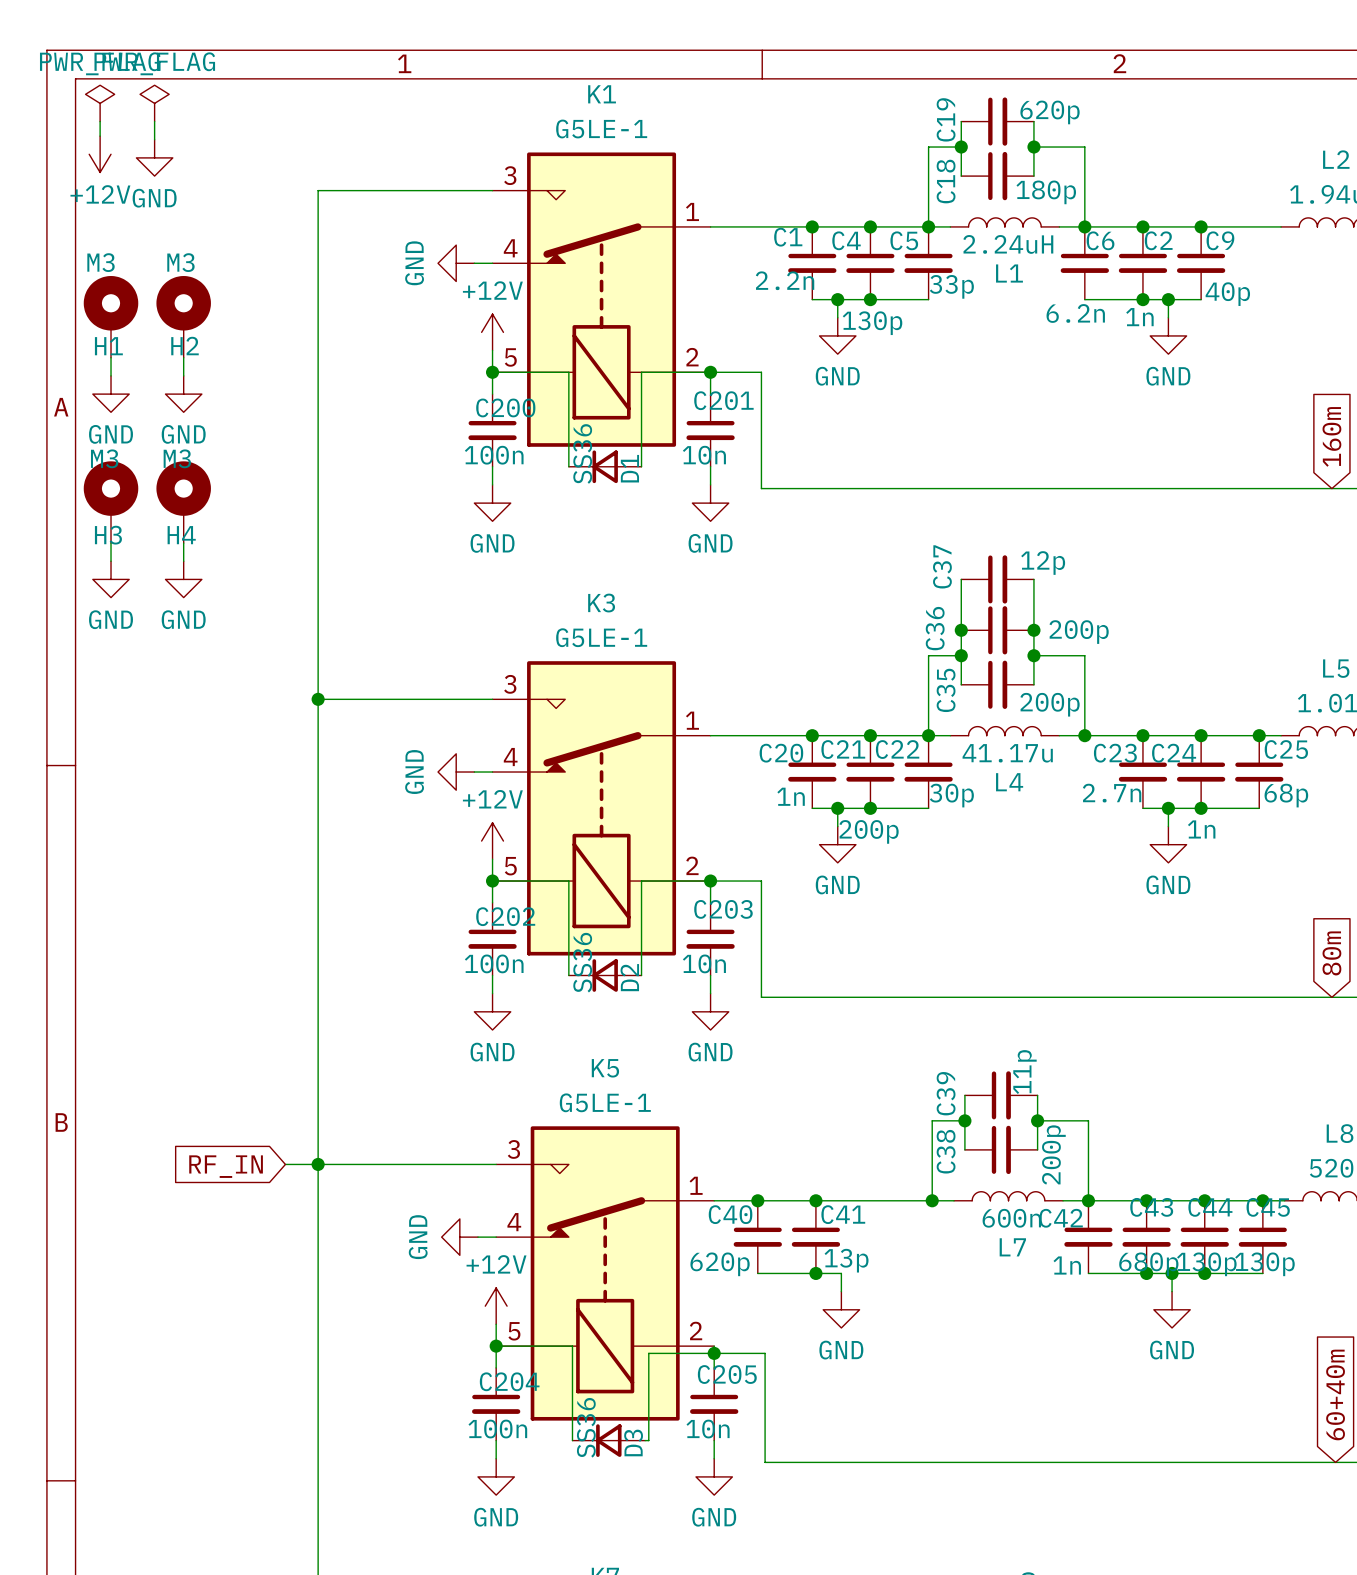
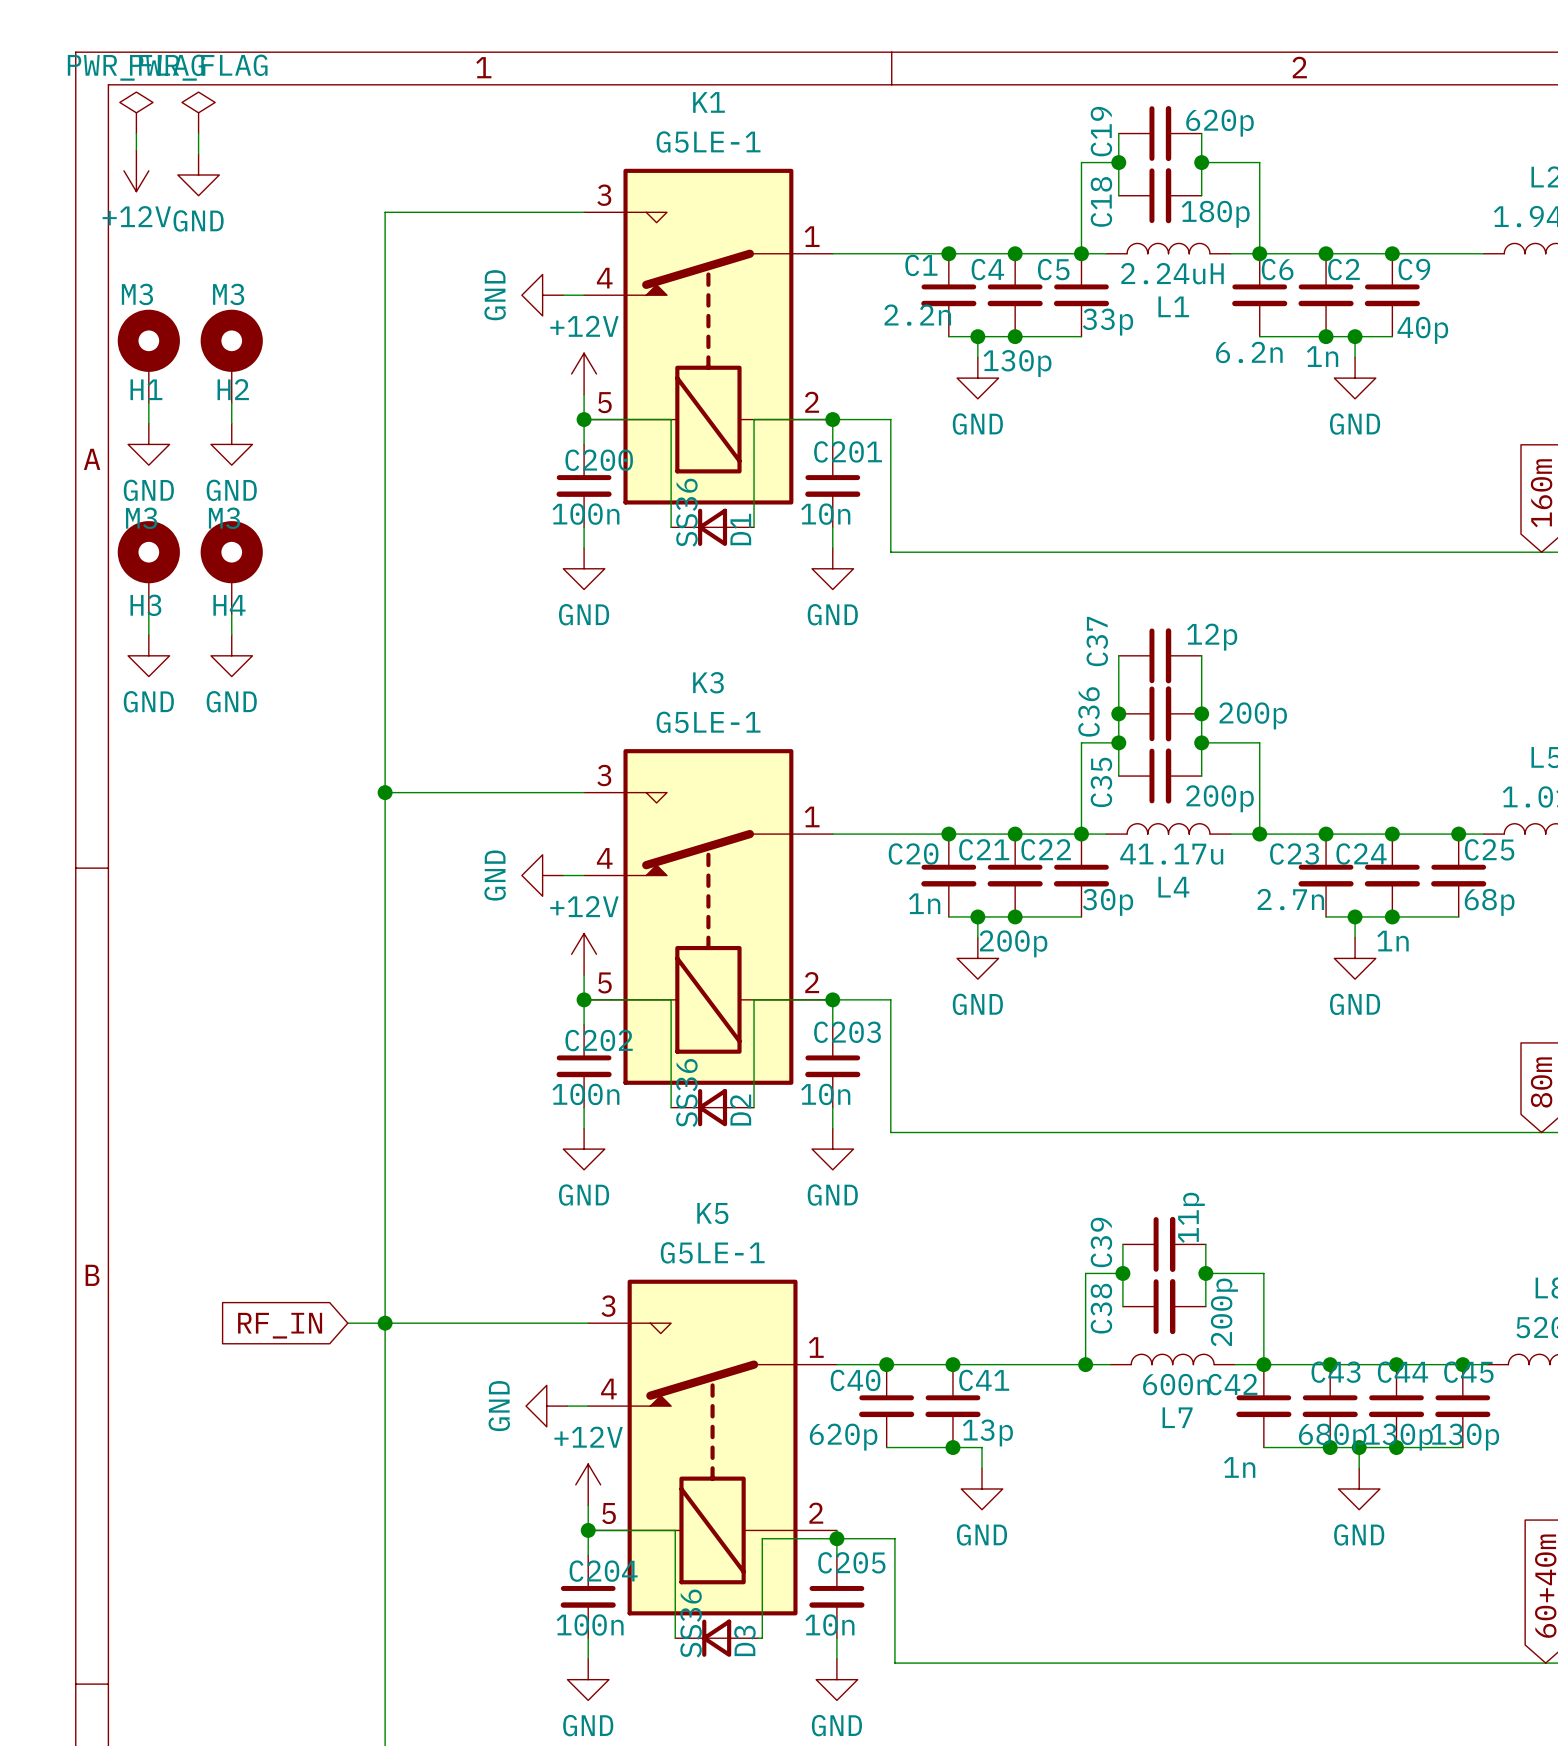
C42 value position: 1n (1067, 1265) -> 1n (1239, 1467)

